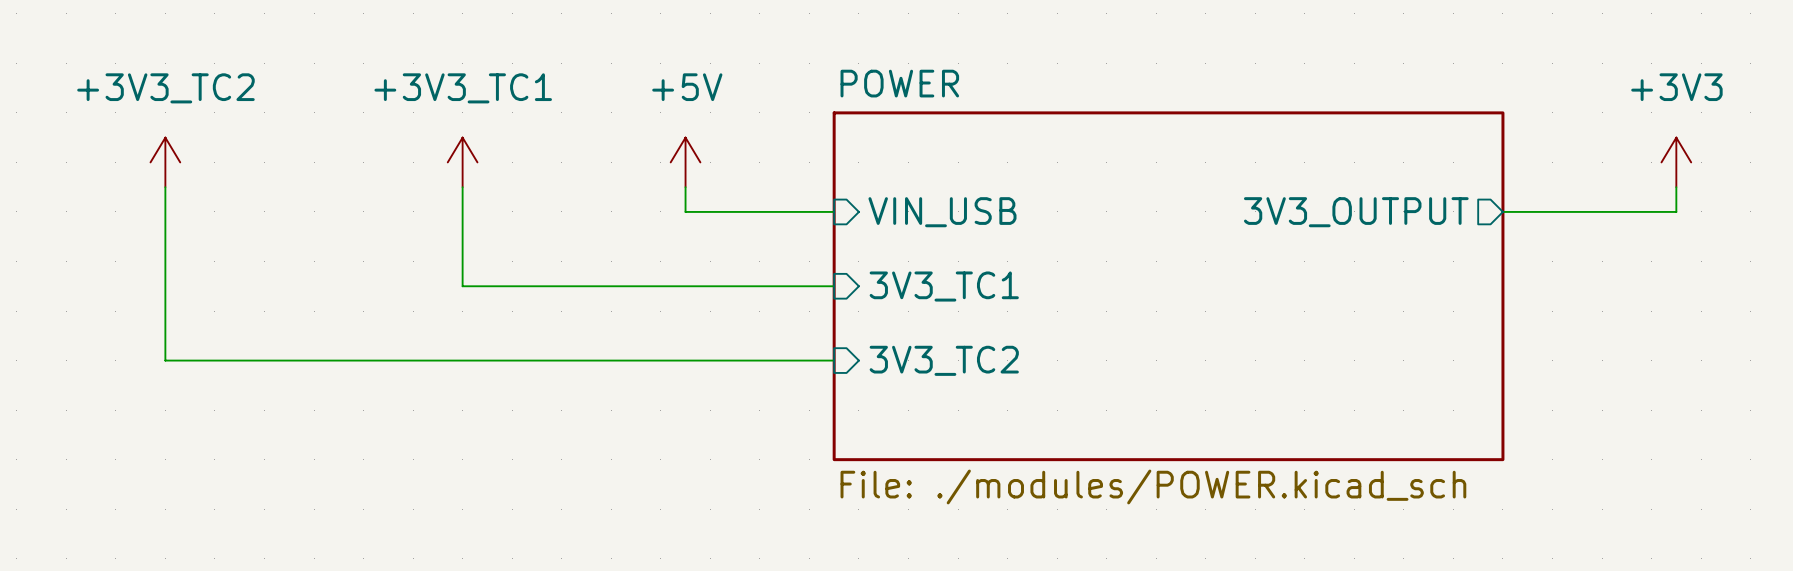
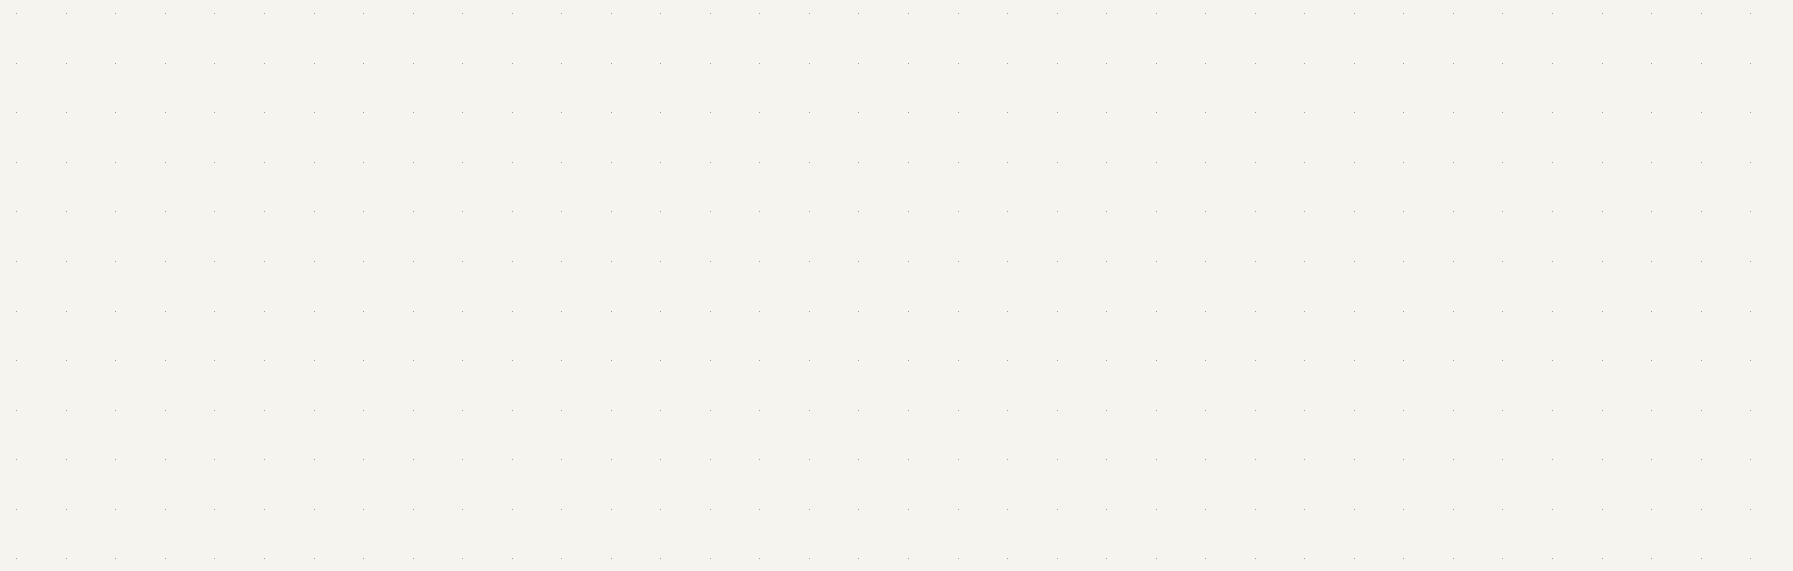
power symbol: +3V3_TC2 (165, 162) -> none
power symbol: +3V3_TC1 (462, 162) -> none
power symbol: +5V (685, 162) -> none
power symbol: +3V3 (1676, 162) -> none
wire: (165, 187) (165, 360) (834, 360) -> none
wire: (462, 187) (462, 286) (834, 286) -> none
wire: (685, 187) (685, 211) (834, 211) -> none
wire: (1676, 187) (1676, 211) (1502, 211) -> none
sheet pin: VIN_USB (942, 212) -> none
sheet pin: 3V3_OUTPUT (1356, 212) -> none
sheet pin: 3V3_TC1 (944, 286) -> none
sheet POWER: File: ./modules/POWER.kicad_sch (1168, 286) -> none
sheet pin: 3V3_TC2 (944, 360) -> none

